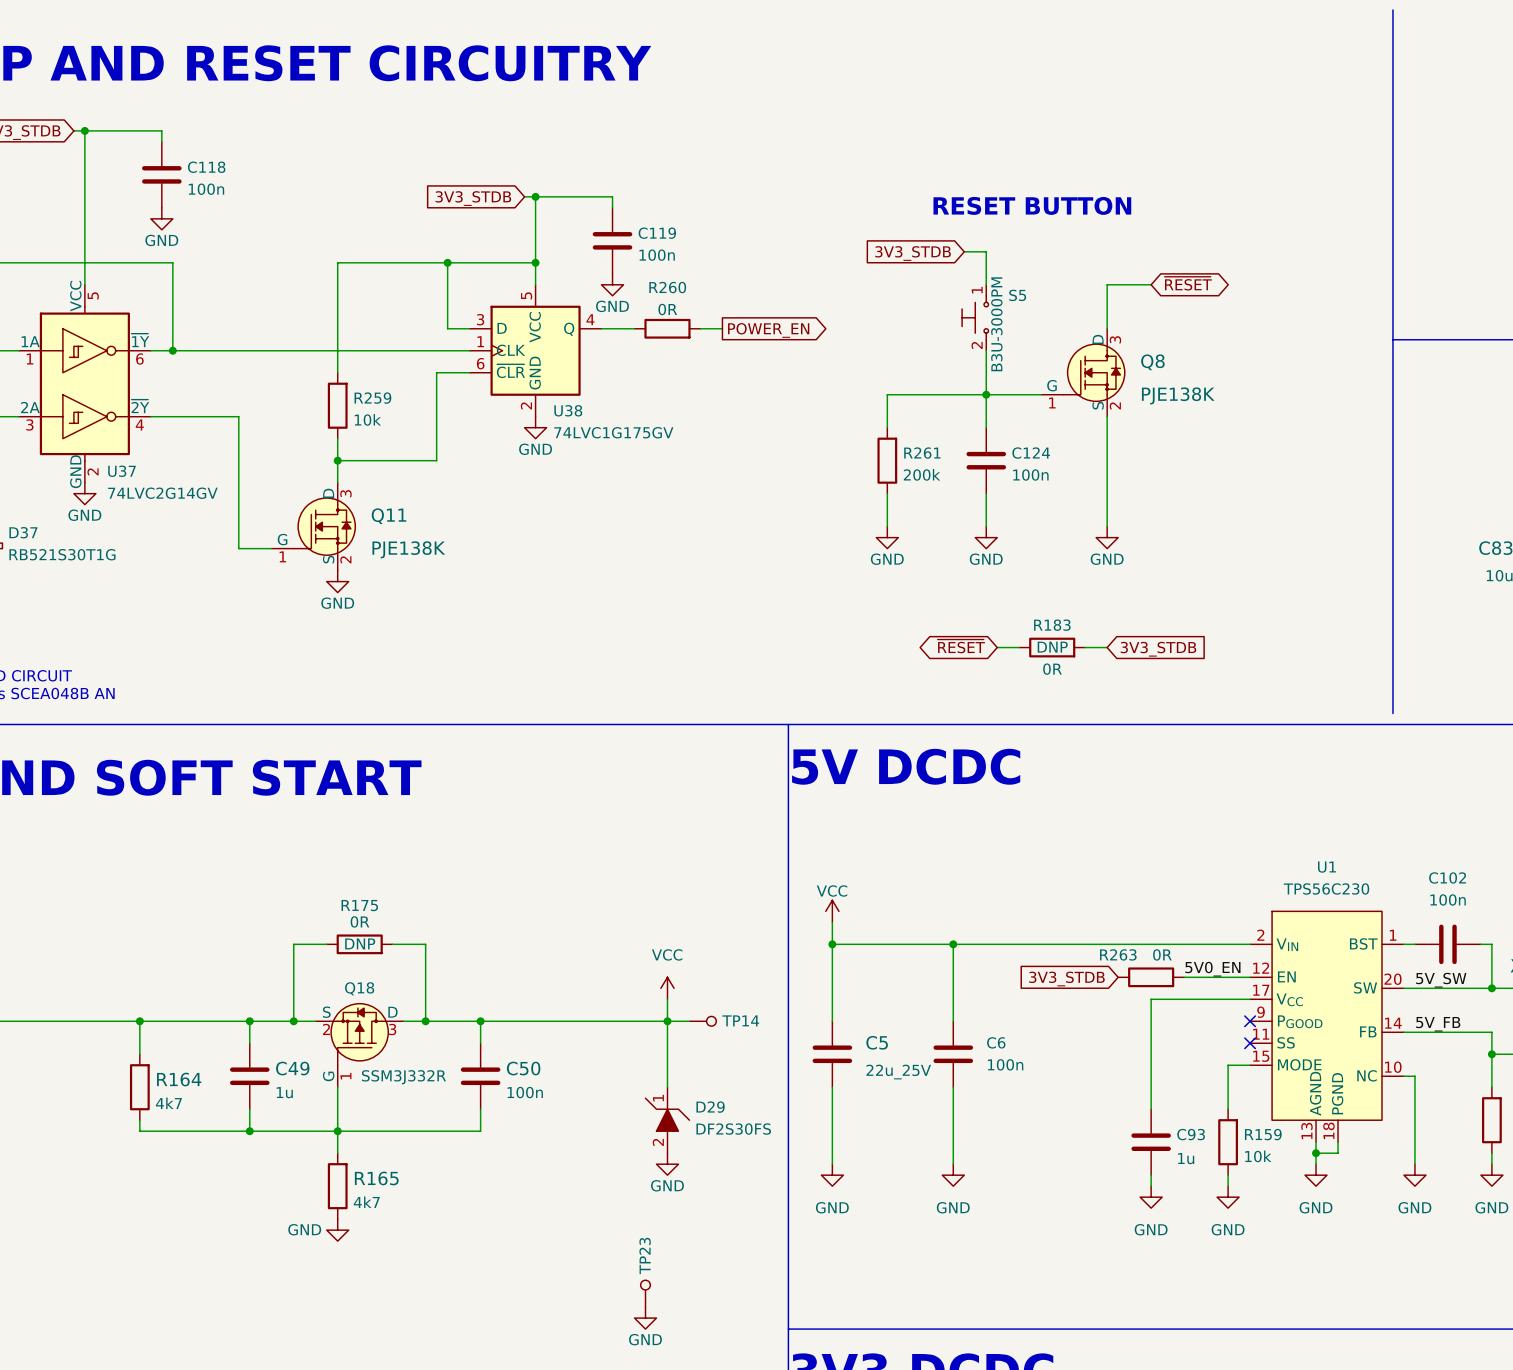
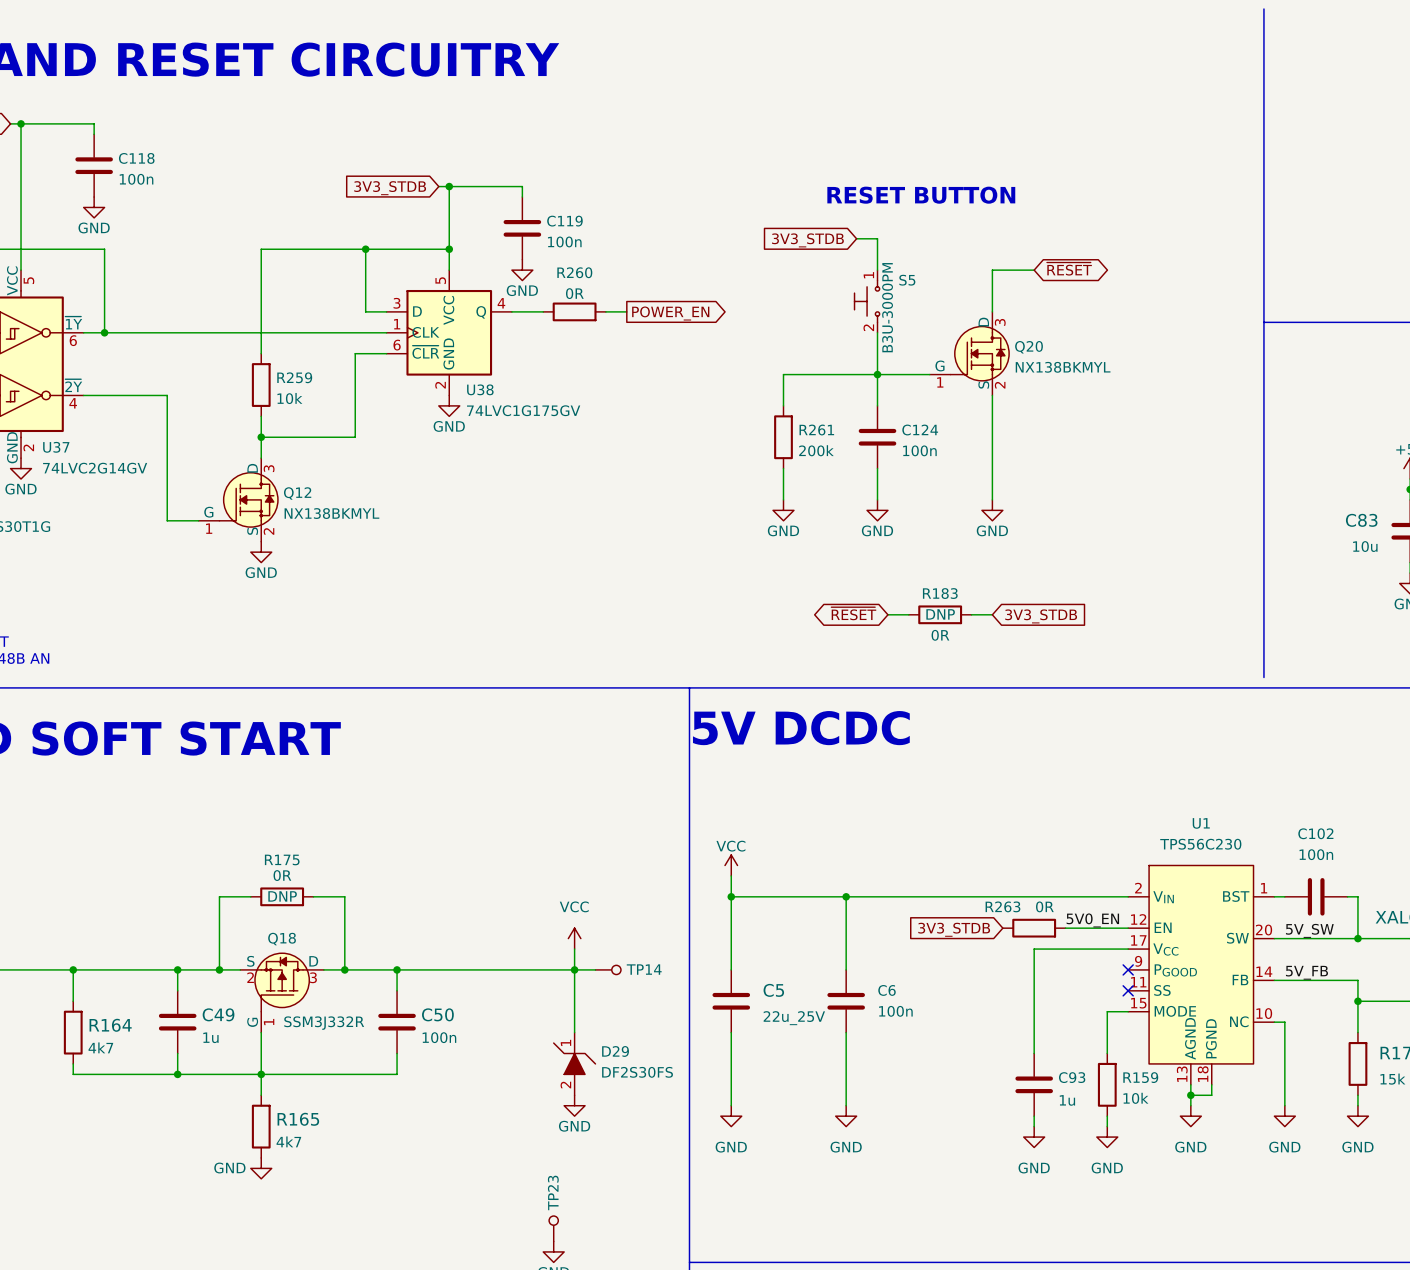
Q8 name: Q8 (1152, 362) -> Q20 (1029, 347)
Q8 value: PJE138K (1178, 395) -> NX138BKMYL (1063, 367)
Q11 name: Q11 (388, 516) -> Q12 (297, 493)
Q11 value: PJE138K (408, 549) -> NX138BKMYL (331, 513)

